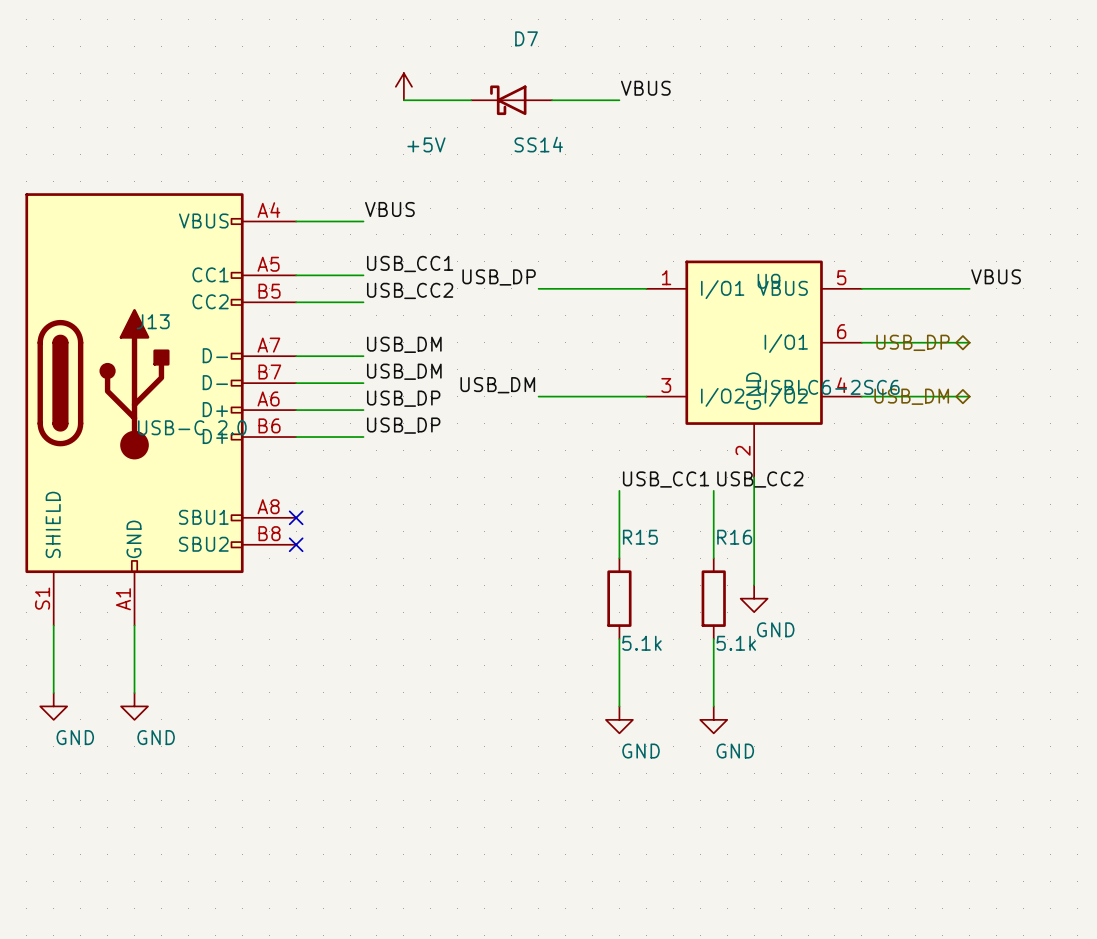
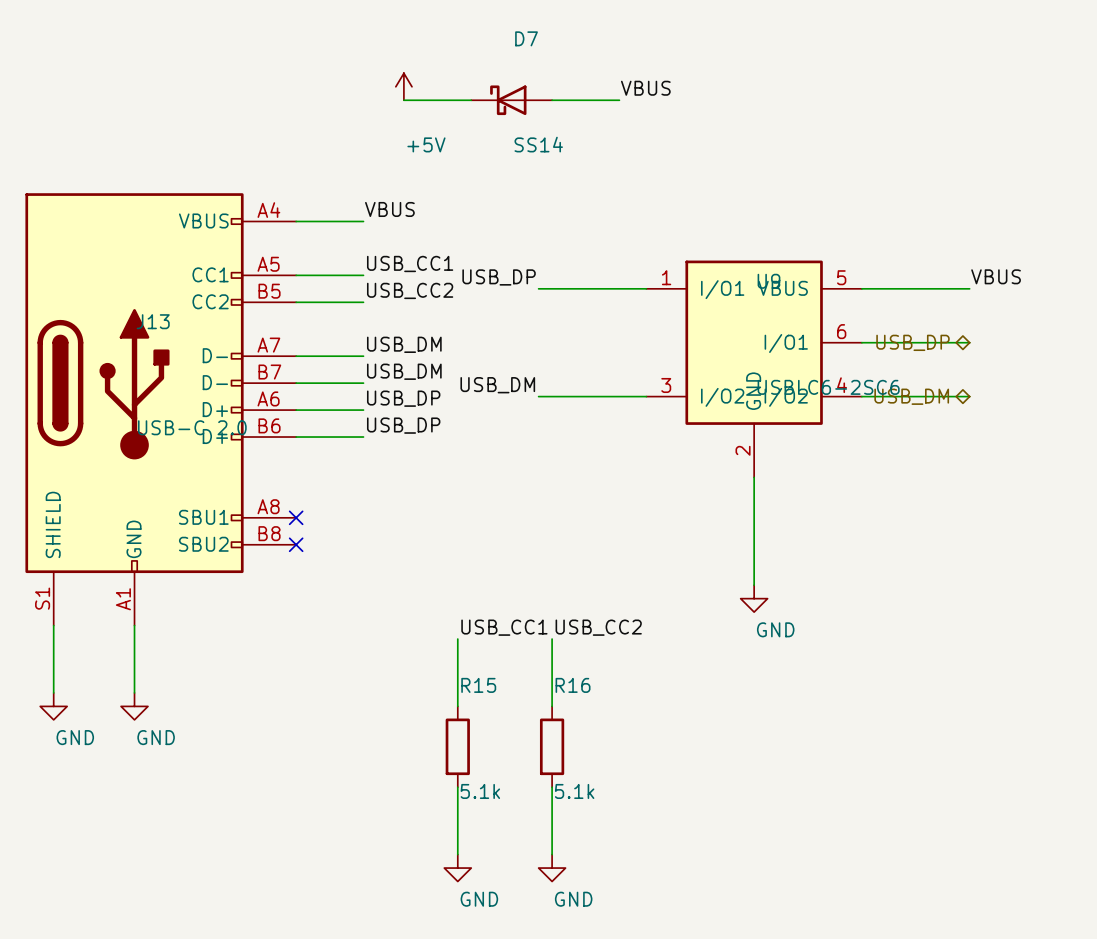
label position: USB_CC1 (666, 479) -> USB_CC1 (504, 627)
label position: USB_CC2 (760, 479) -> USB_CC2 (598, 627)
wire: (619, 490) (619, 558) -> (457, 639) (457, 706)
wire: (713, 490) (713, 558) -> (552, 639) (552, 706)
R15 position: (619, 598) -> (457, 746)
R16 position: (713, 598) -> (552, 746)
wire: (619, 639) (619, 706) -> (457, 787) (457, 854)
wire: (713, 639) (713, 706) -> (552, 787) (552, 854)
power symbol: GND (619, 719) -> none
power symbol: GND (713, 719) -> none
power symbol: none -> GND (457, 868)
power symbol: none -> GND (552, 868)

